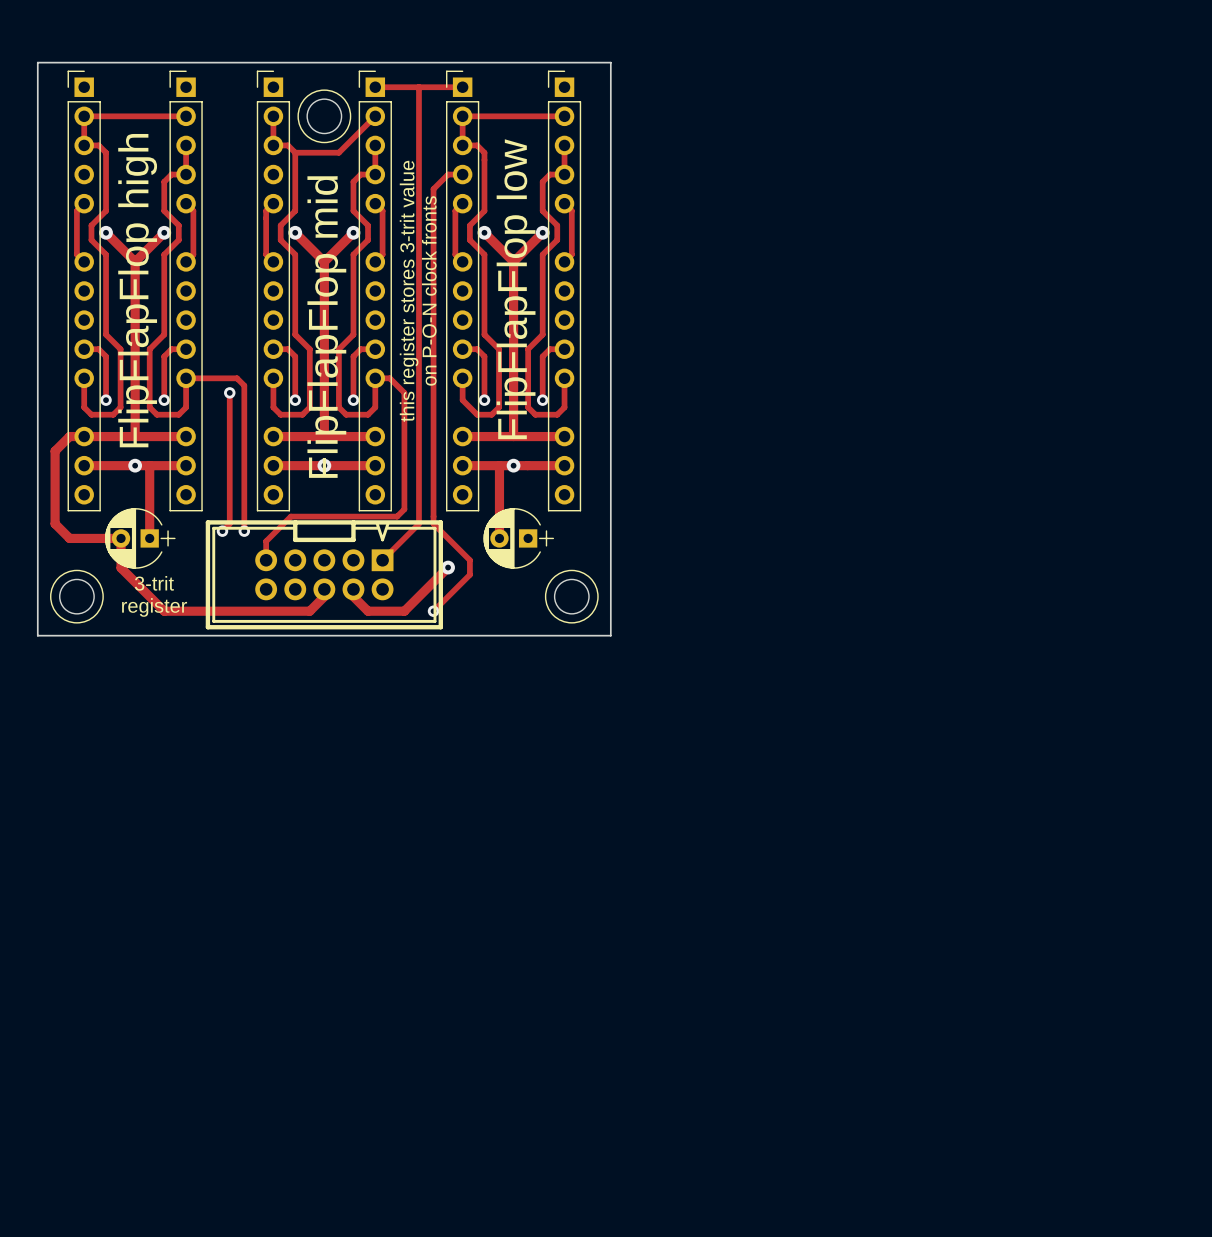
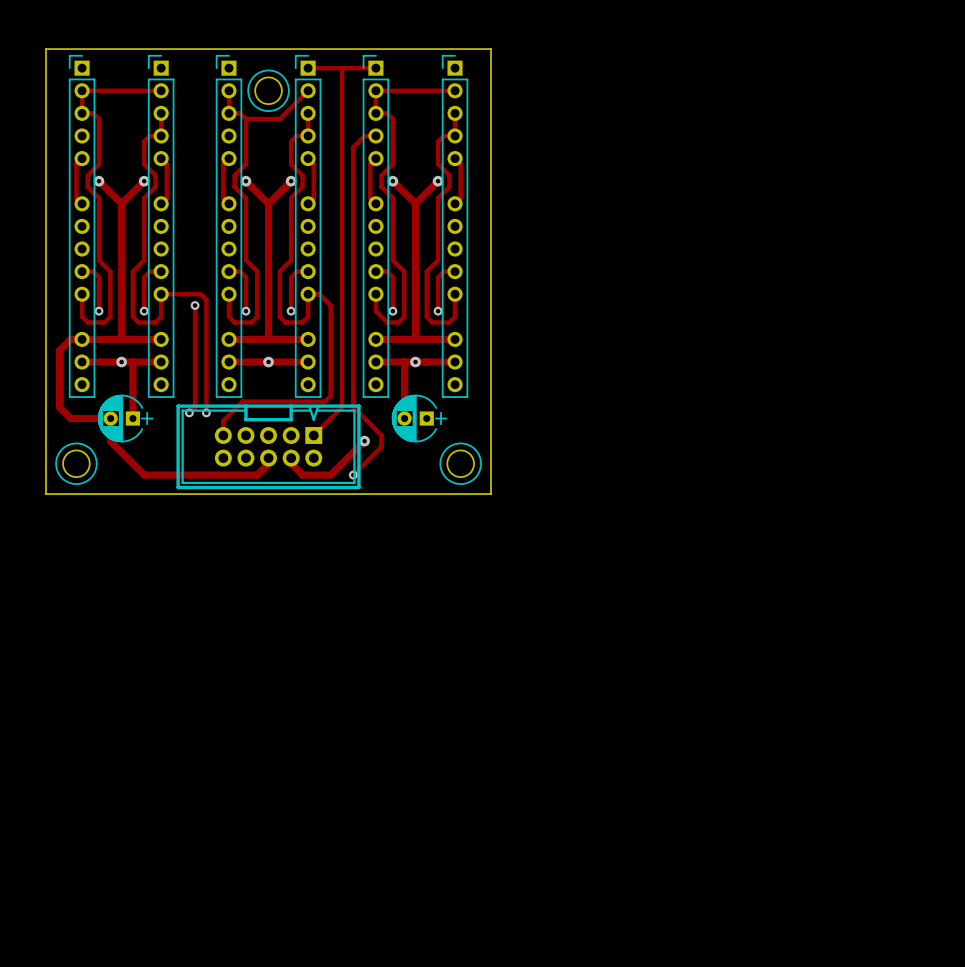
text: FlipFlapFlop low (516, 289) -> none
text: FlipFlapFlop high (137, 290) -> none
text: on P-O-N clock fronts (429, 290) -> none
text: this register stores 3-trit value (409, 291) -> none
text: FlipFlapFlop mid (326, 327) -> none
text: 3-trit (154, 583) -> none
text: register (154, 607) -> none

